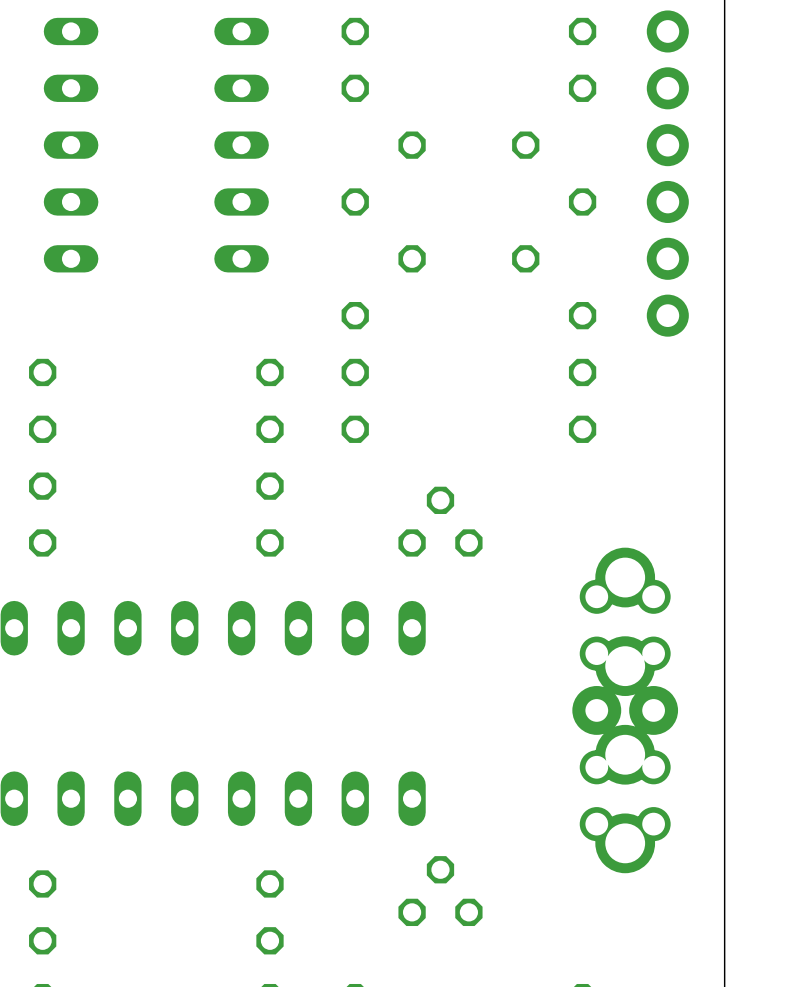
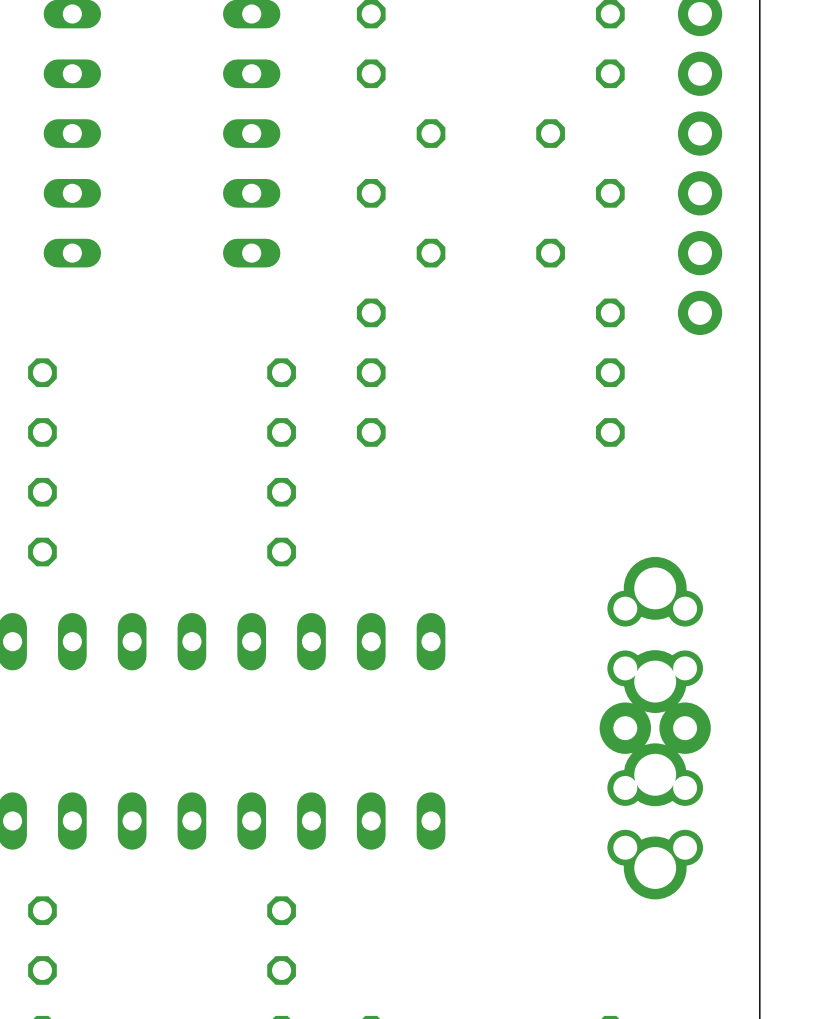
part: (440, 521) -> none
part: (440, 891) -> none

